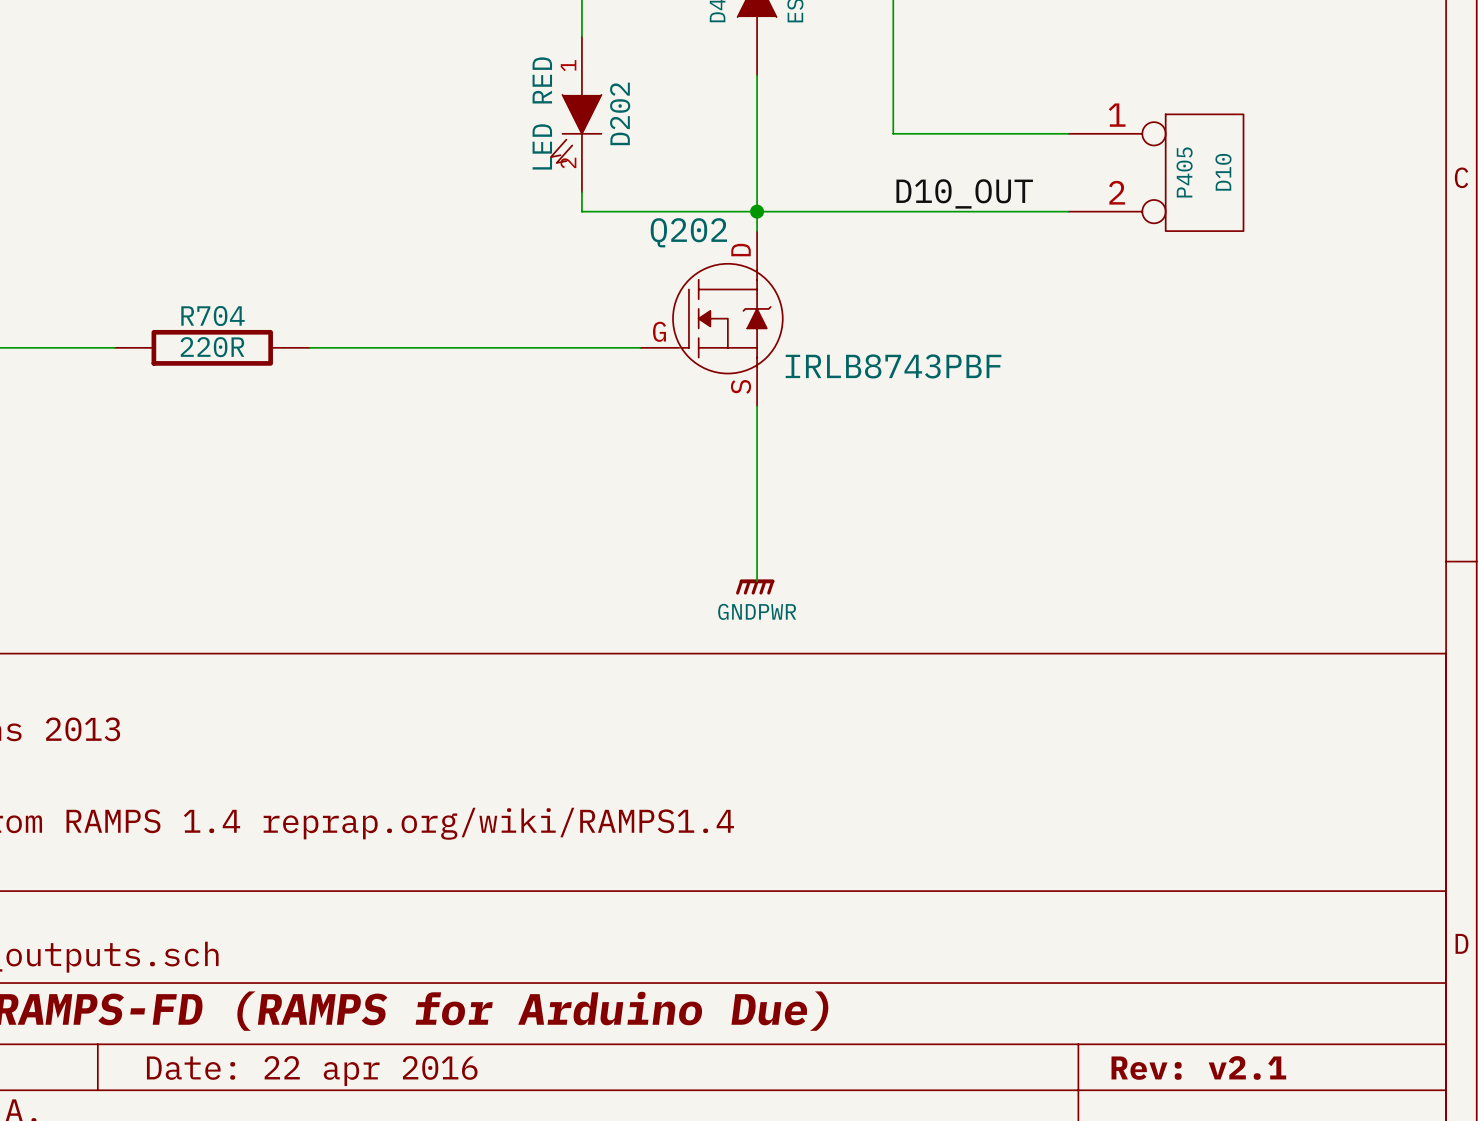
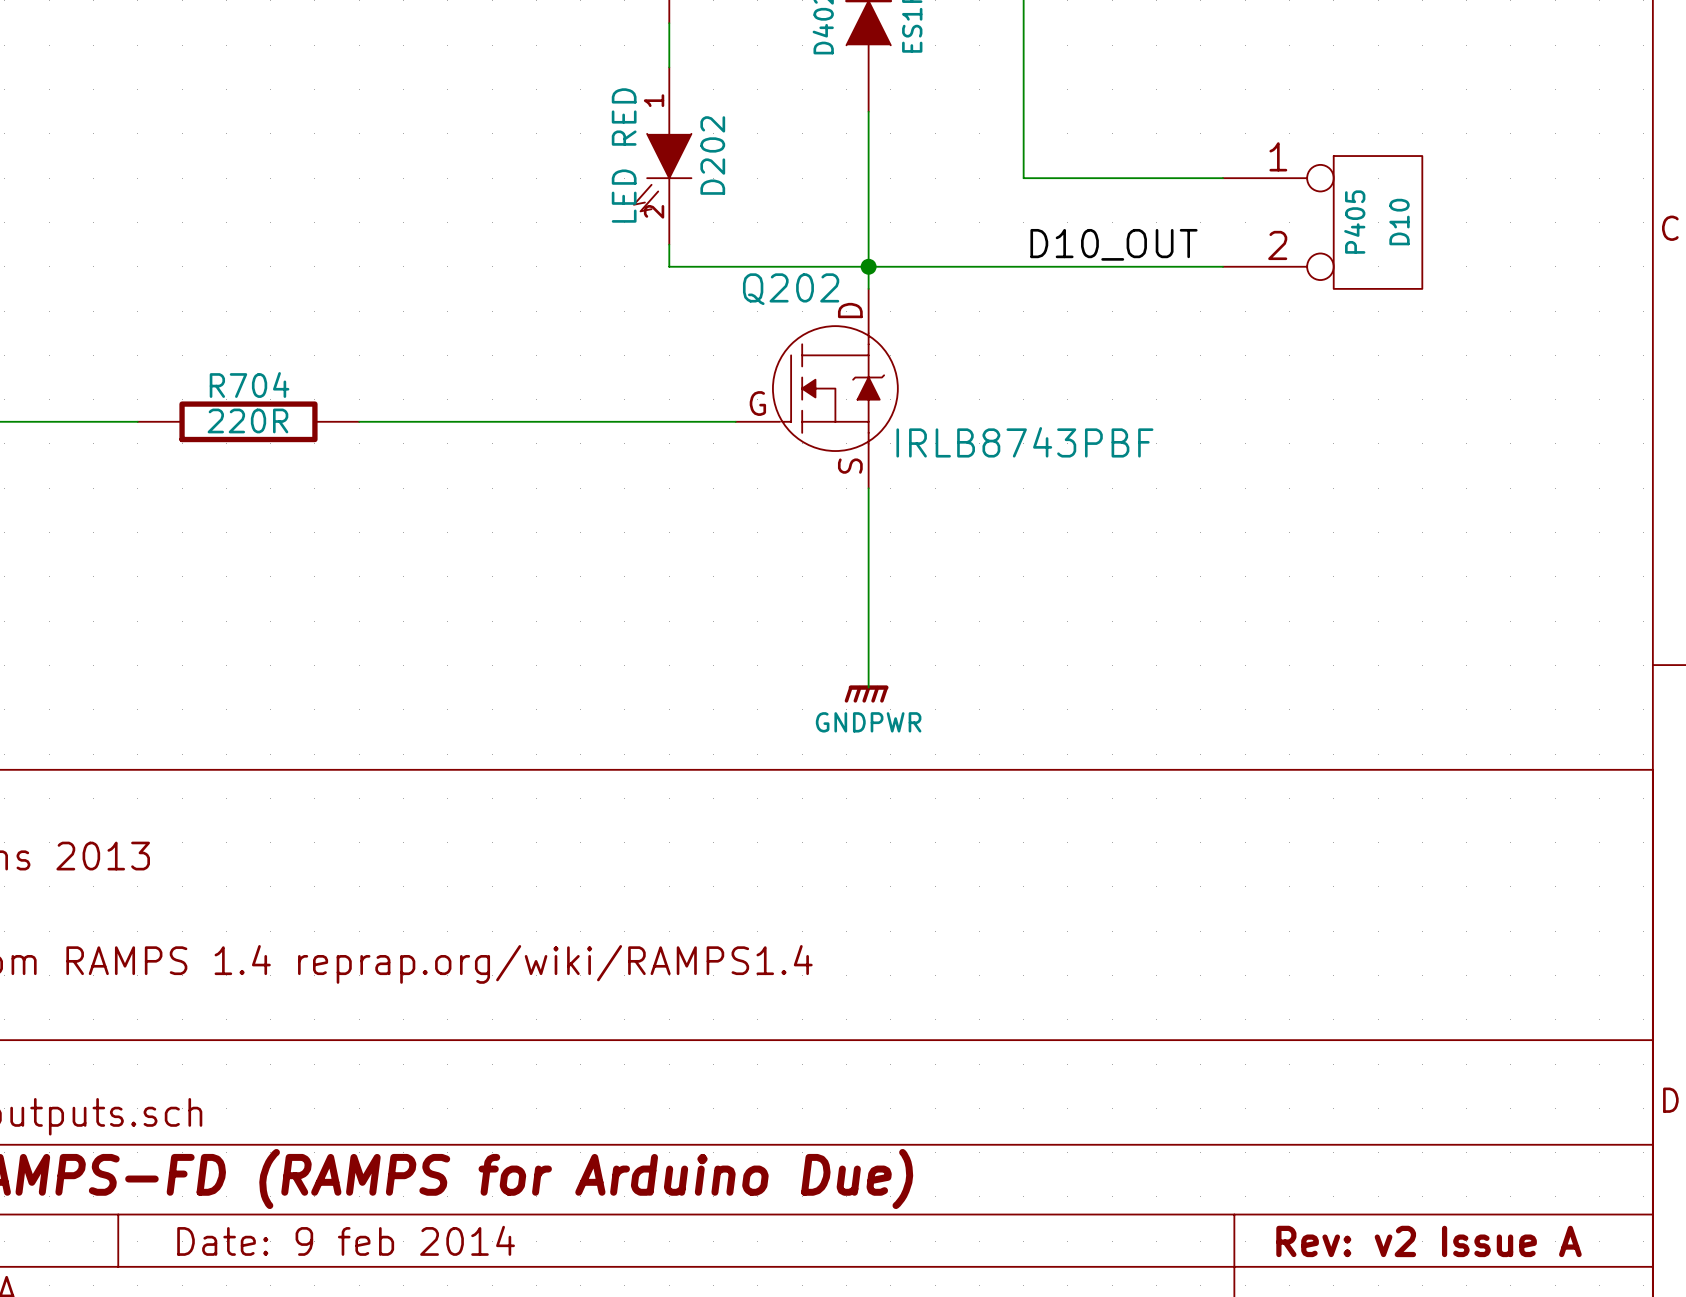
title block: Rev: v2.1 (1198, 1067) -> Rev: v2 Issue A (1429, 1241)
title block: Date: 22 apr 2016 (312, 1071) -> Date: 9 feb 2014 (346, 1240)

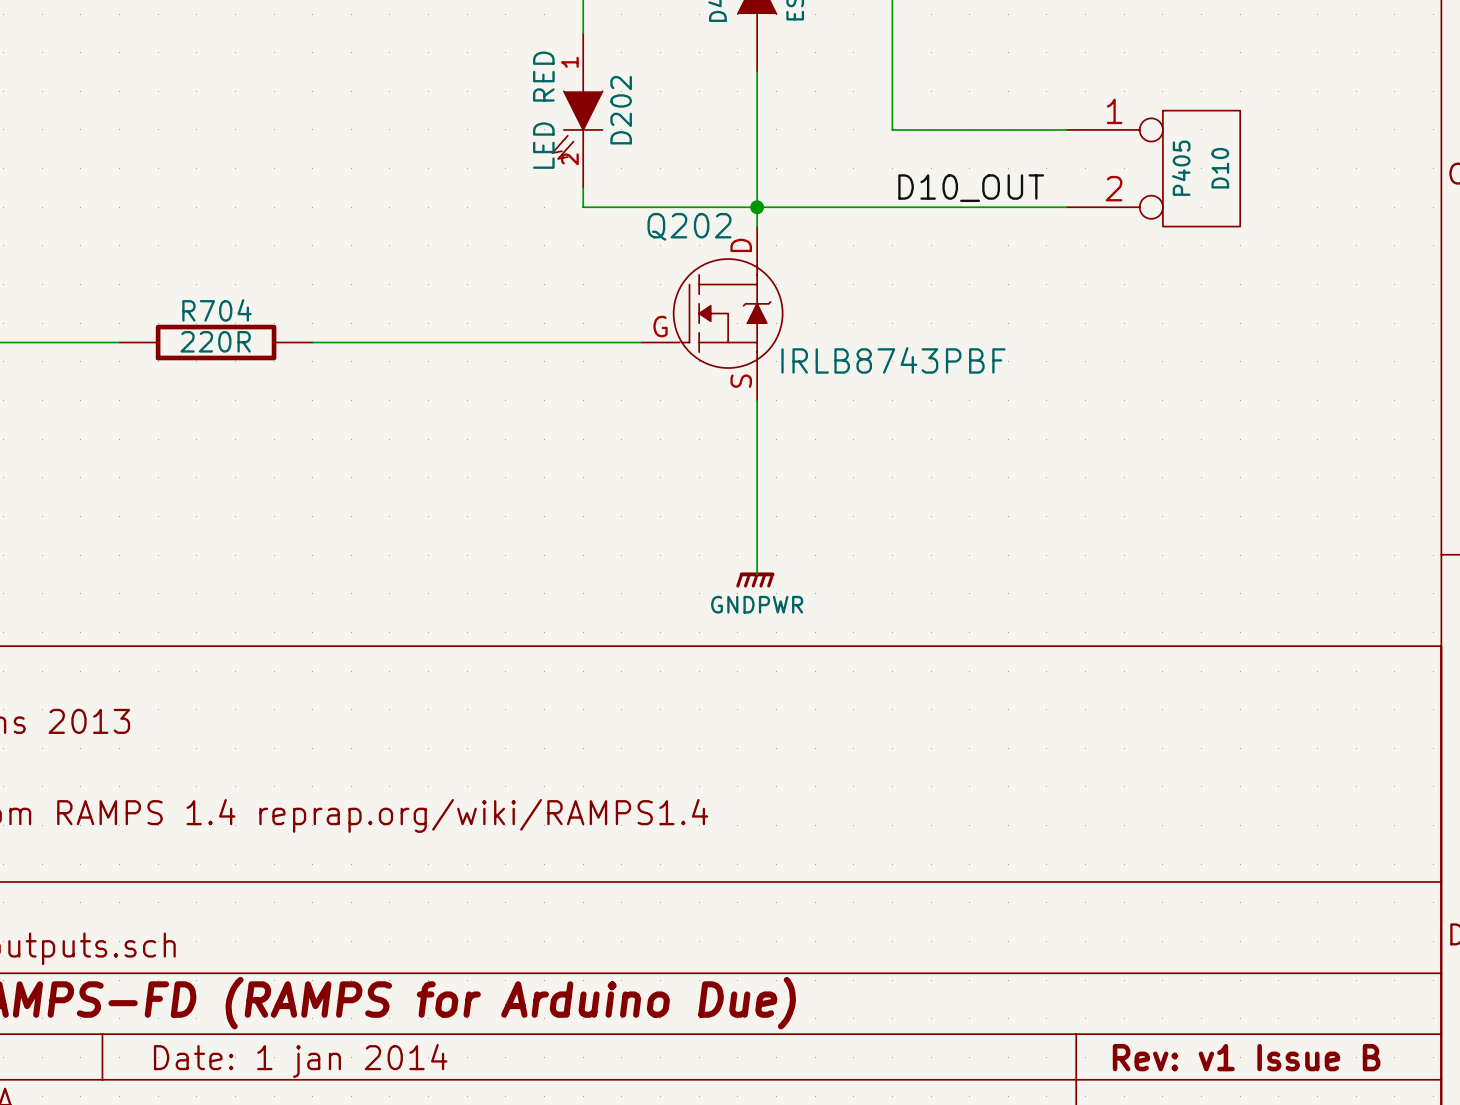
title block: Date: 9 feb 2014 (346, 1240) -> Date: 1 jan 2014 (300, 1060)
title block: Rev: v2 Issue A (1429, 1241) -> Rev: v1 Issue B (1246, 1057)

